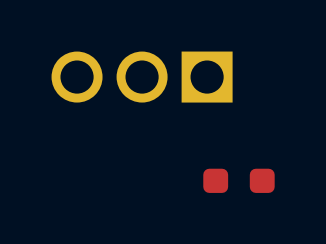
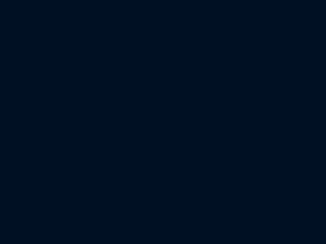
part: (142, 77) -> none
part: (238, 180) -> none

